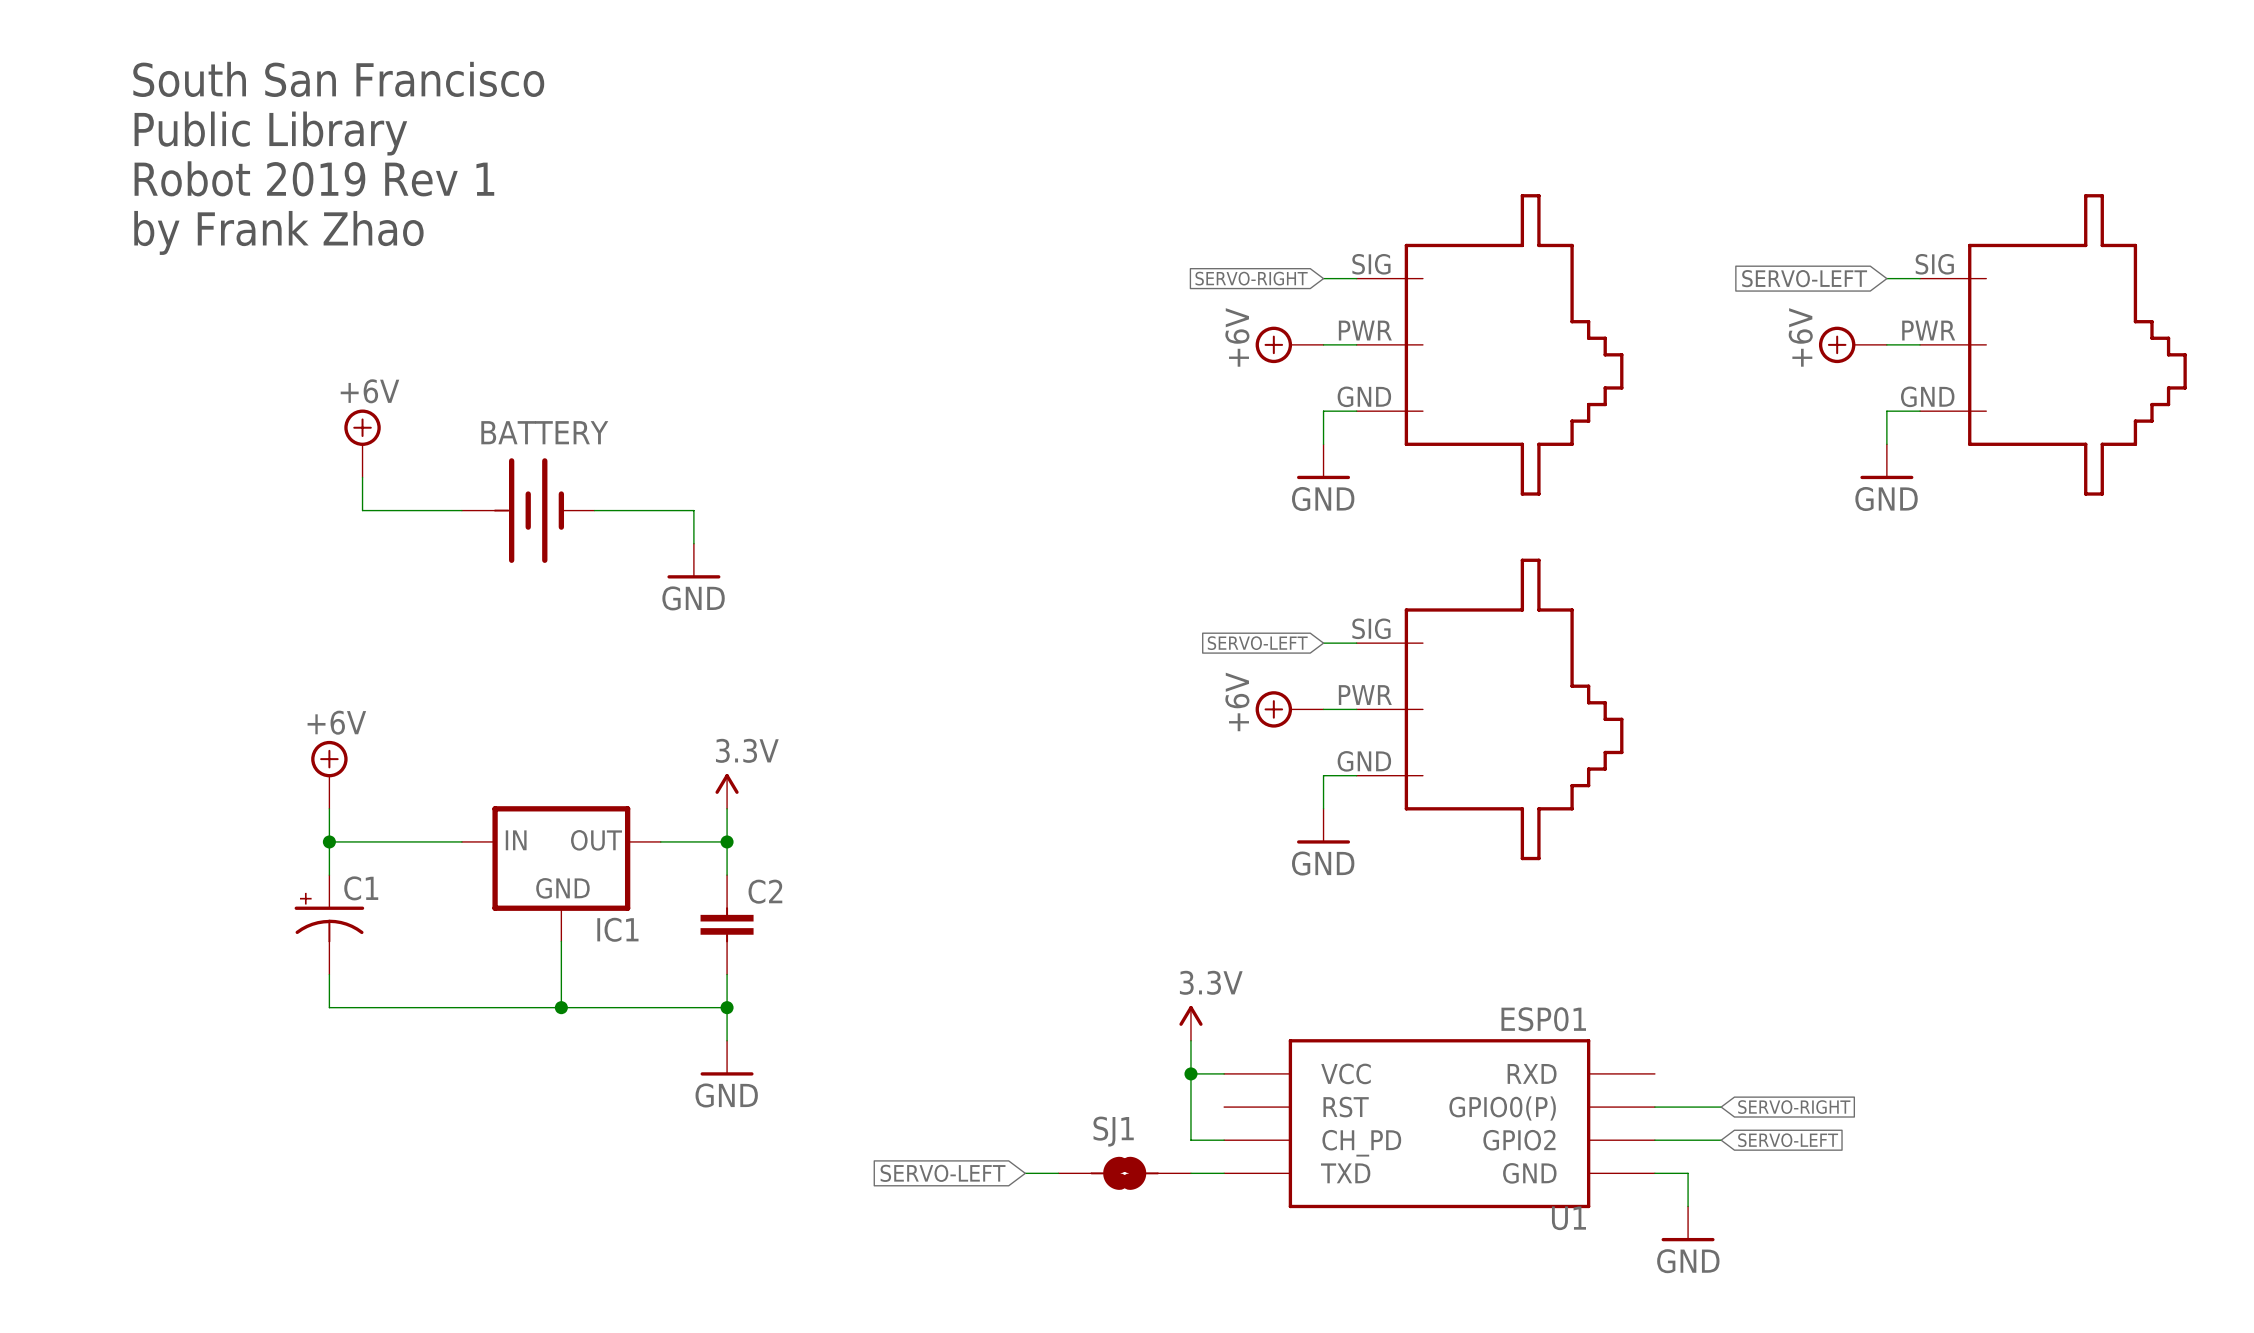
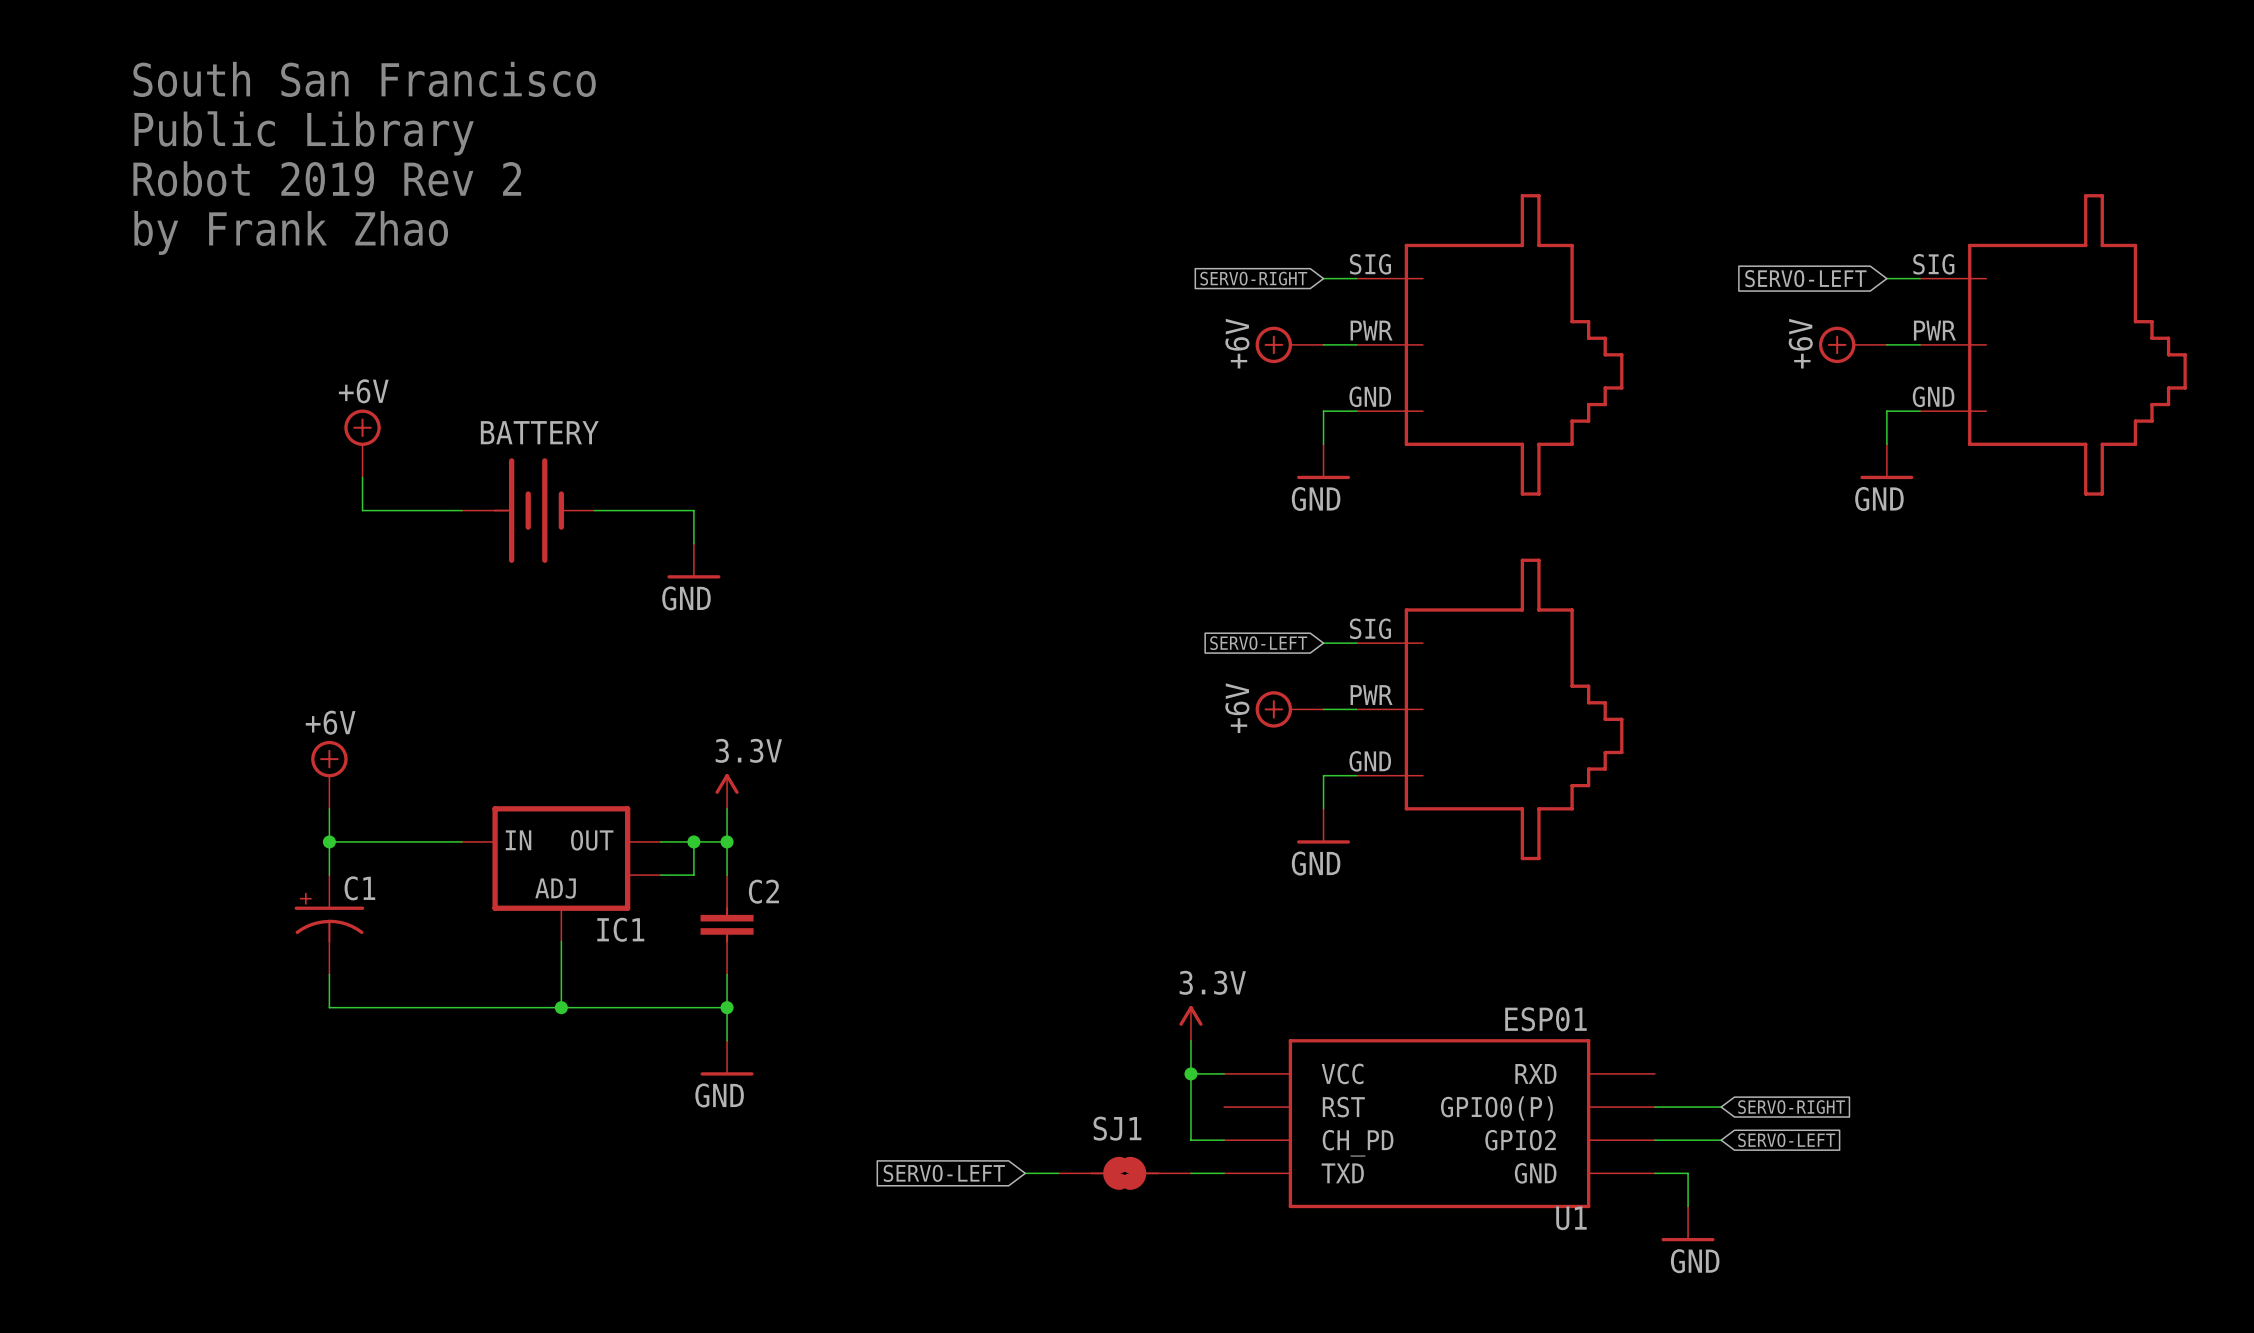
part text: Robot 2019 Rev 1 (314, 178) -> Robot 2019 Rev 2 (327, 178)
IC1 symbol: [461, 806, 661, 942] -> [461, 806, 661, 942]
wire: none -> (693, 841) (693, 875) (660, 875)
junction: none -> (693, 841)

